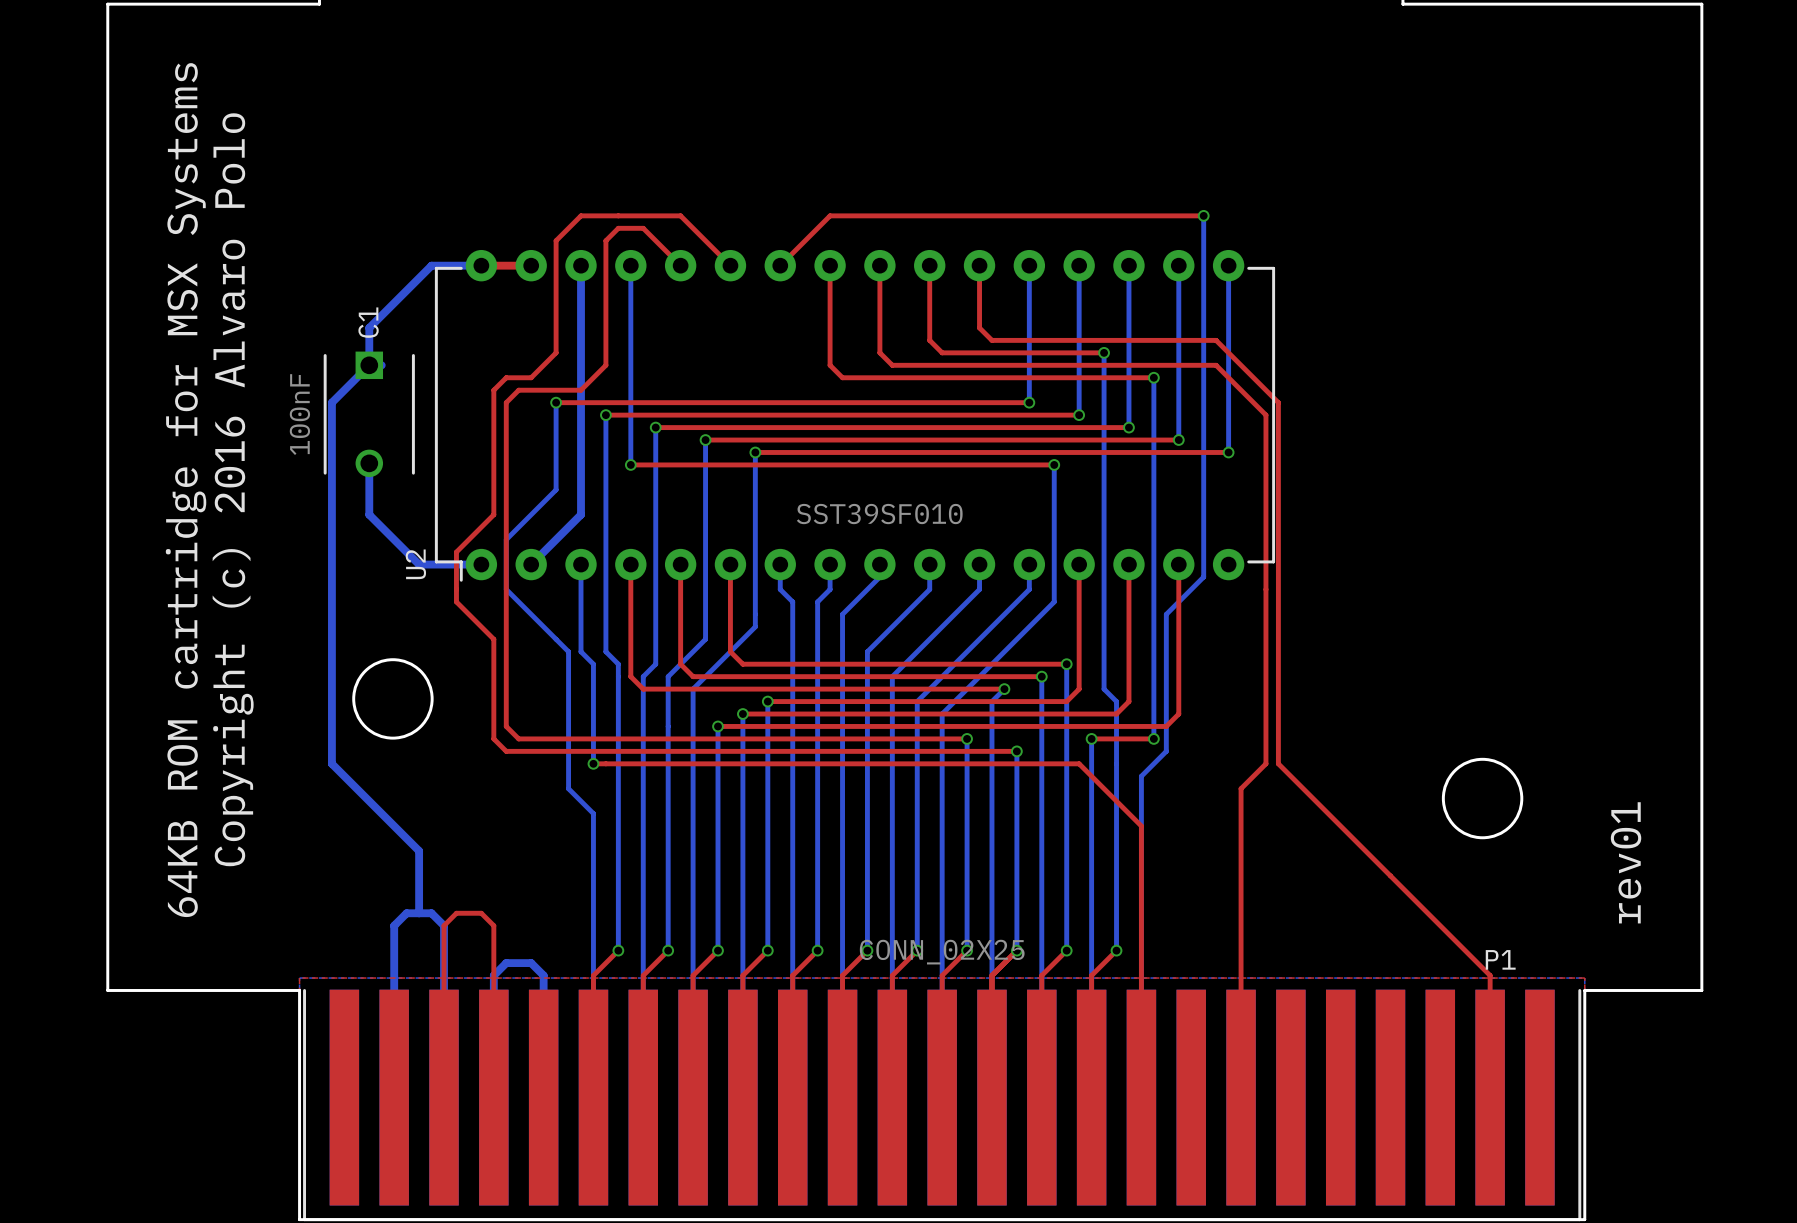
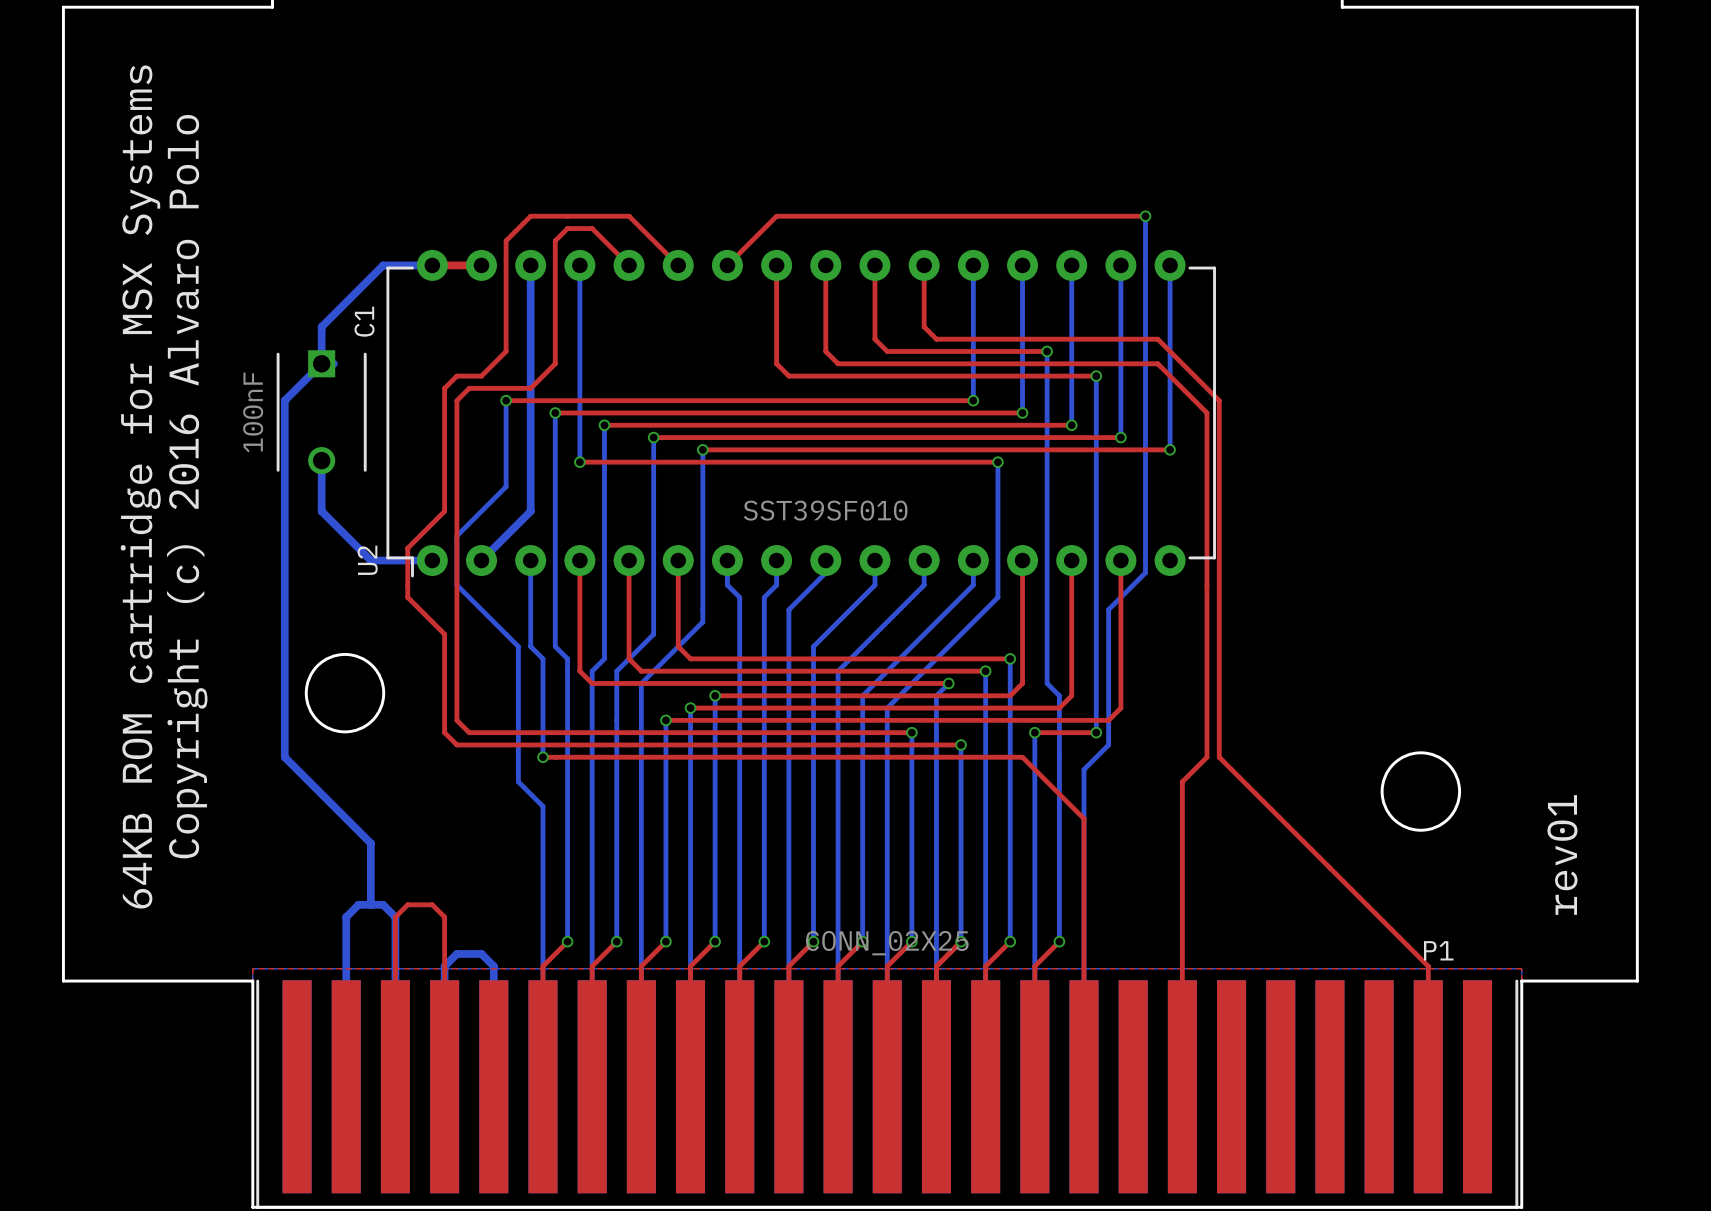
C1 name position: C1 (368, 322) -> C1 (364, 321)

